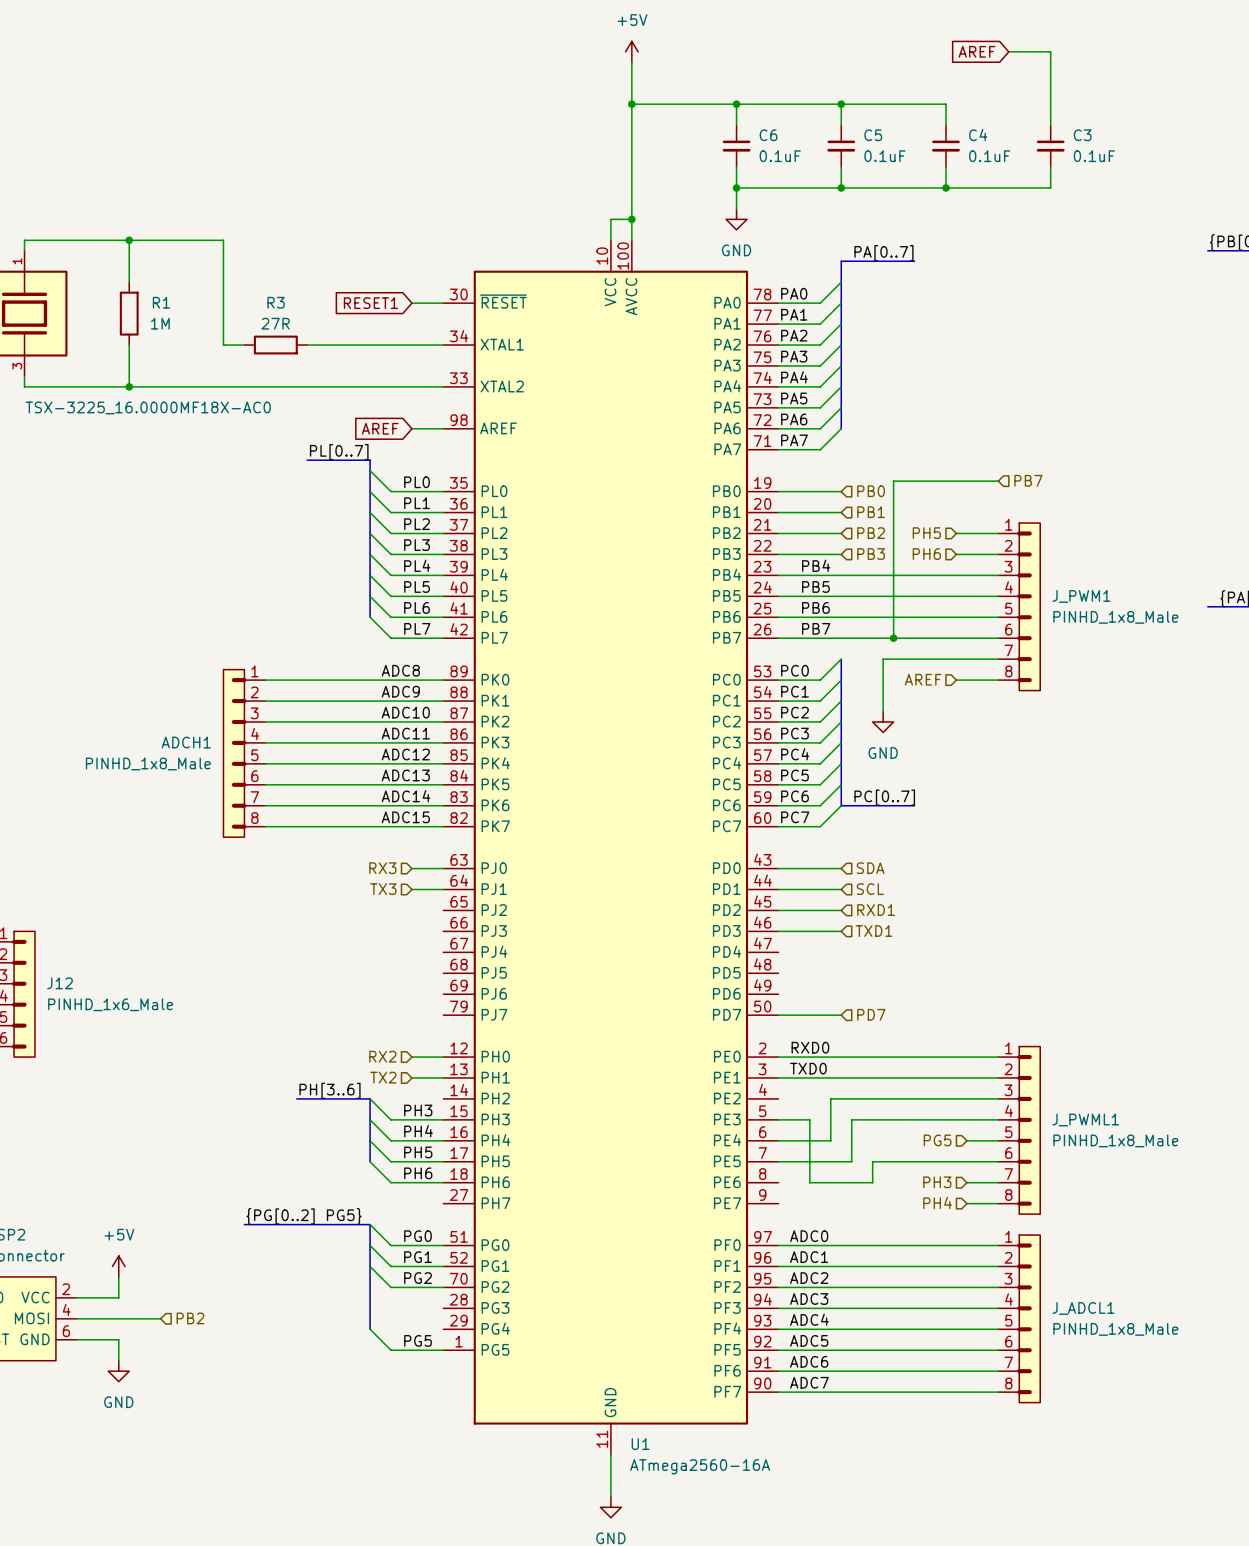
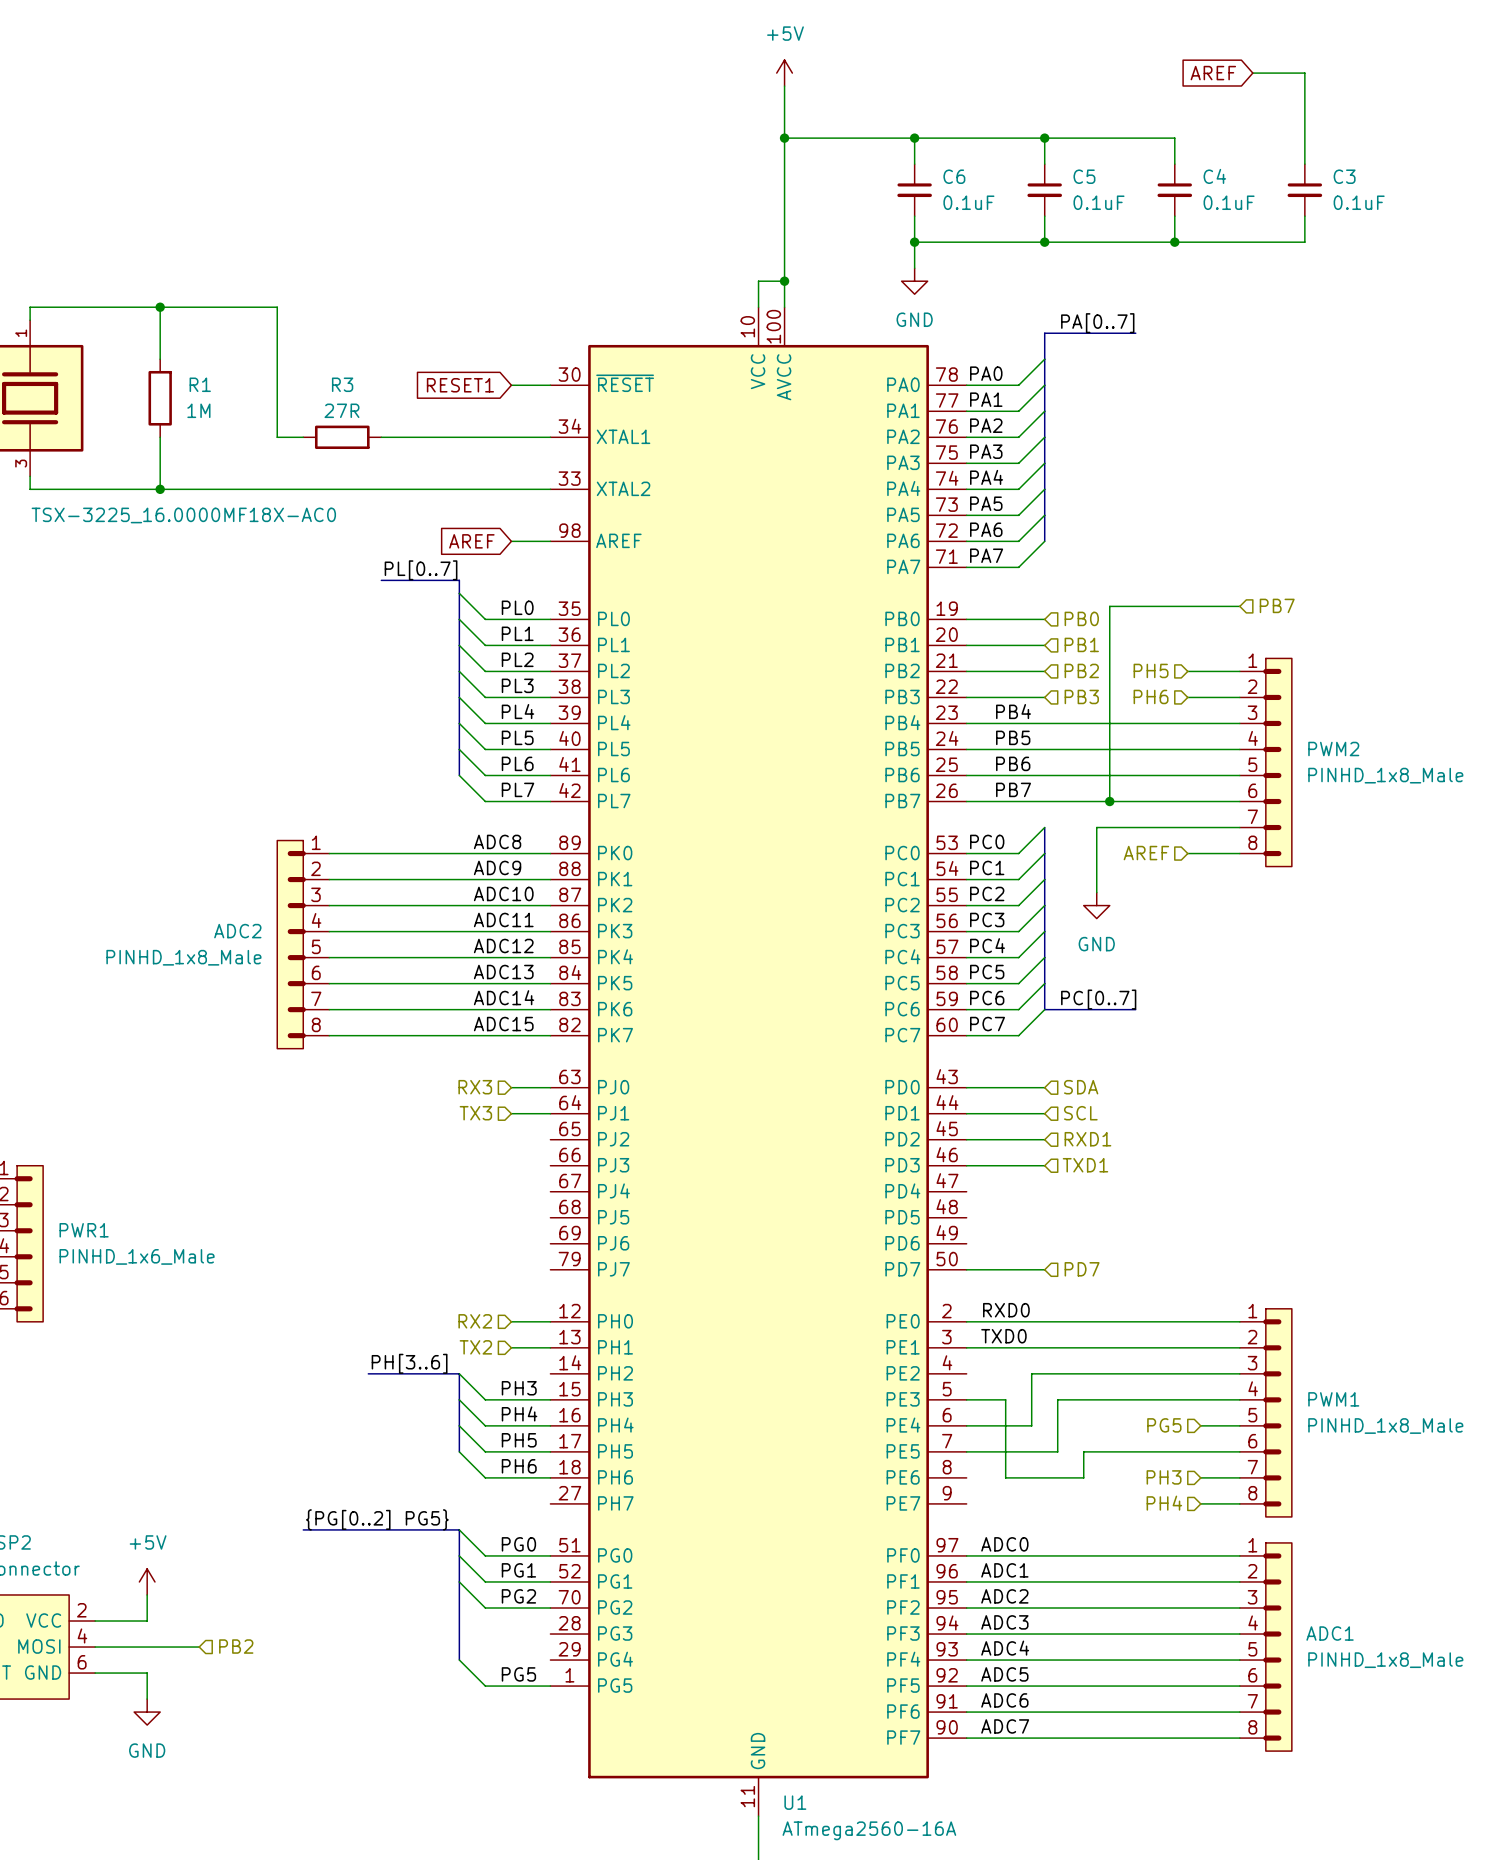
J_PWM1 name: J_PWM1 (1081, 596) -> PWM2 (1333, 749)
ADCH1 name: ADCH1 (186, 742) -> ADC2 (237, 931)
J12 name: J12 (60, 983) -> PWR1 (84, 1230)
J_PWML1 name: J_PWML1 (1085, 1119) -> PWM1 (1333, 1399)
J_ADCL1 name: J_ADCL1 (1083, 1308) -> ADC1 (1330, 1633)

